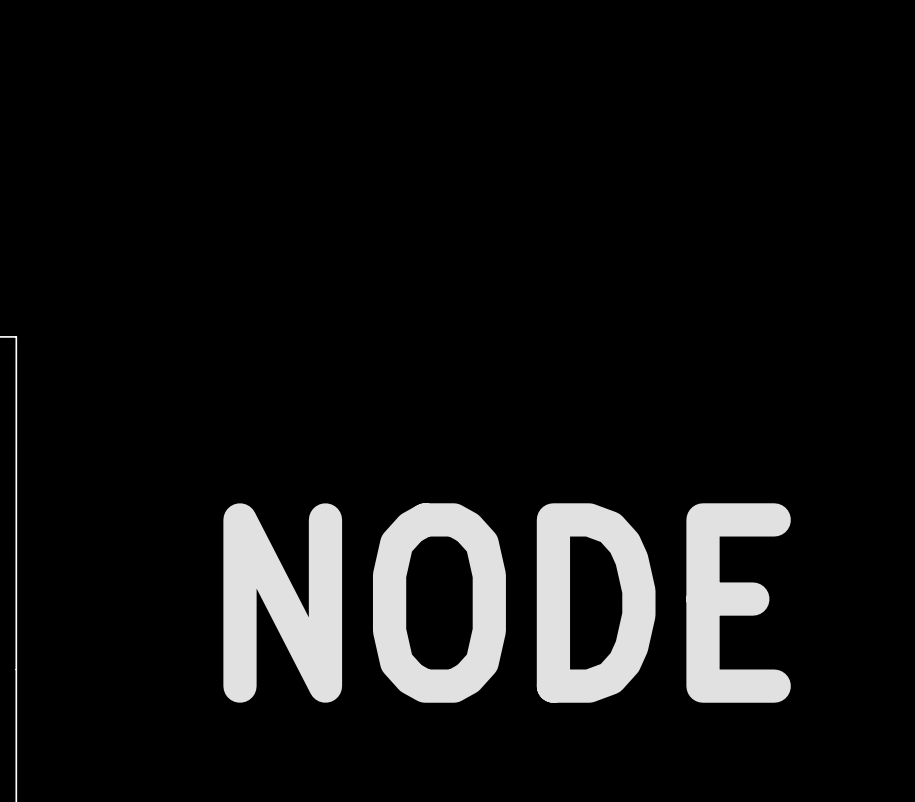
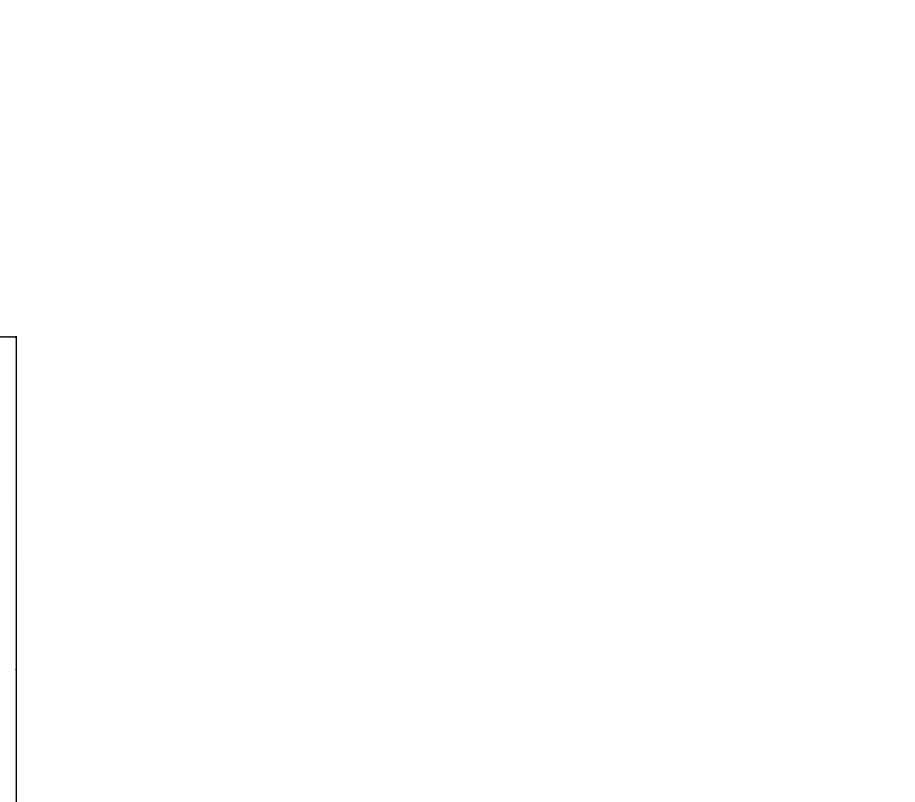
text: NODE (507, 603) -> none

